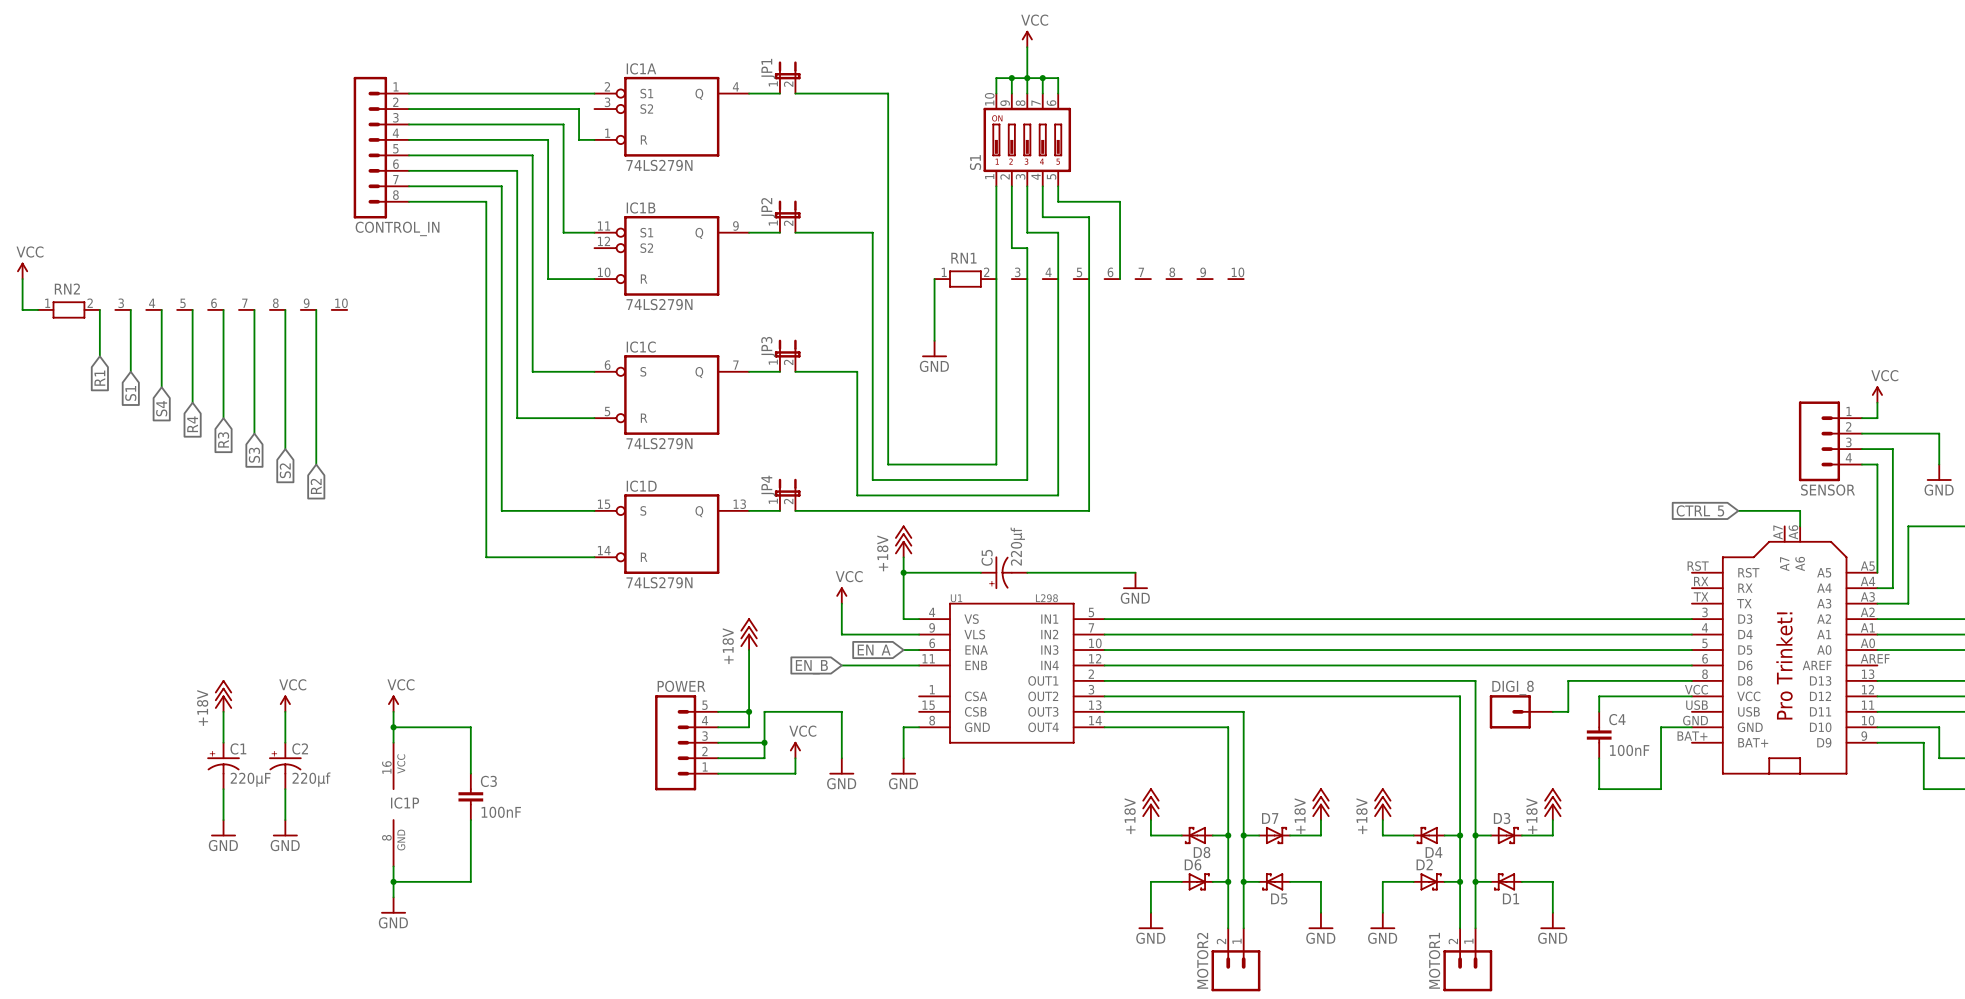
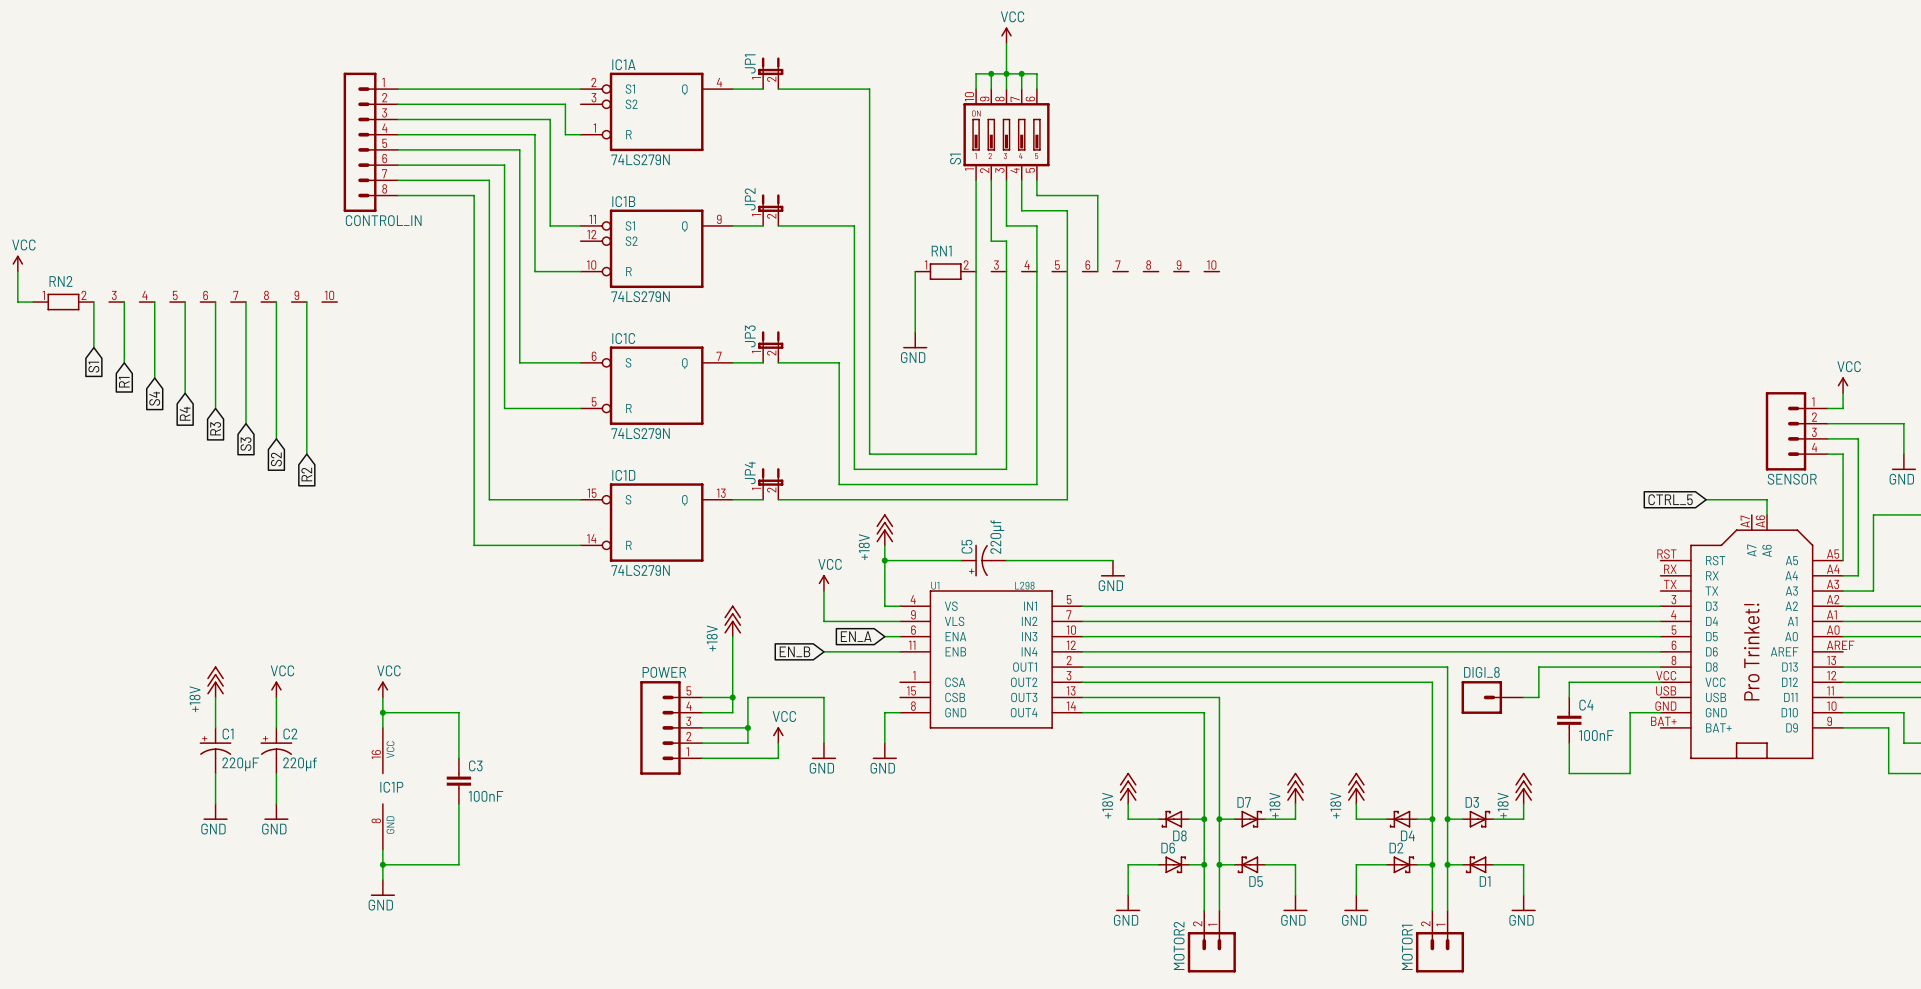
global label: R1 (99, 378) -> S1 (93, 367)
global label: S1 (130, 393) -> R1 (124, 382)

